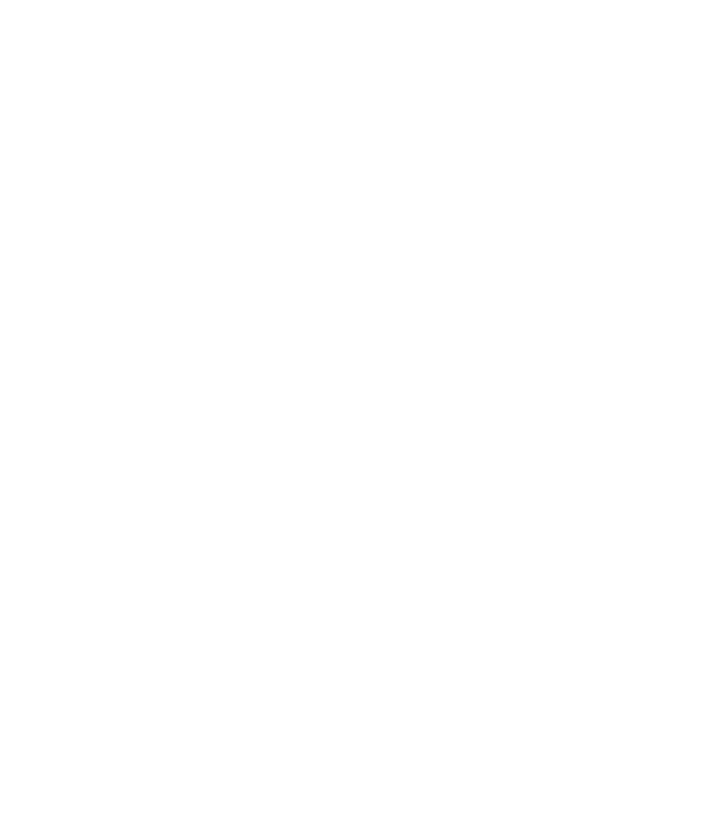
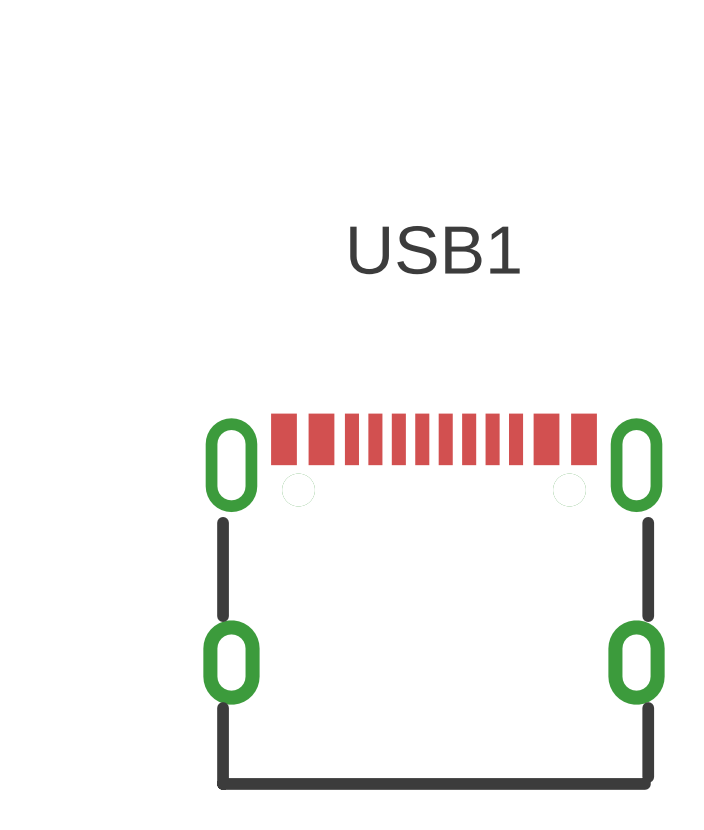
USB1: none -> (433, 601)

